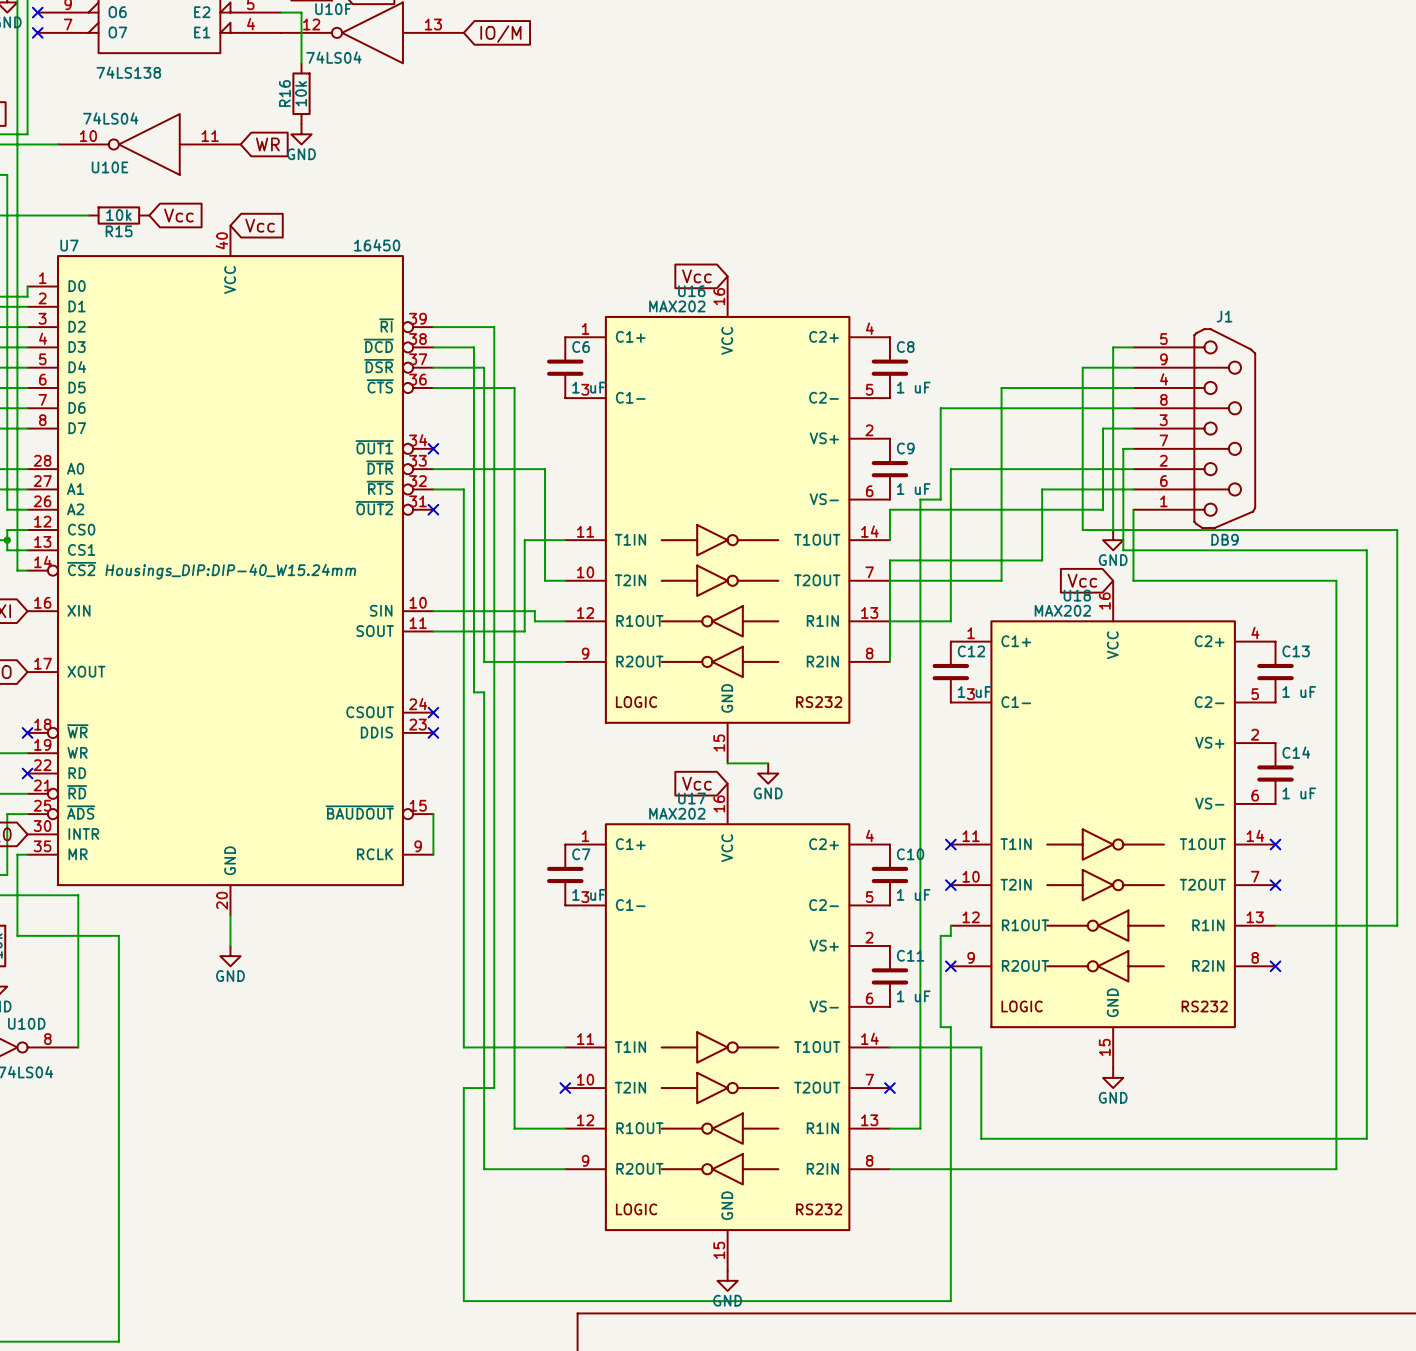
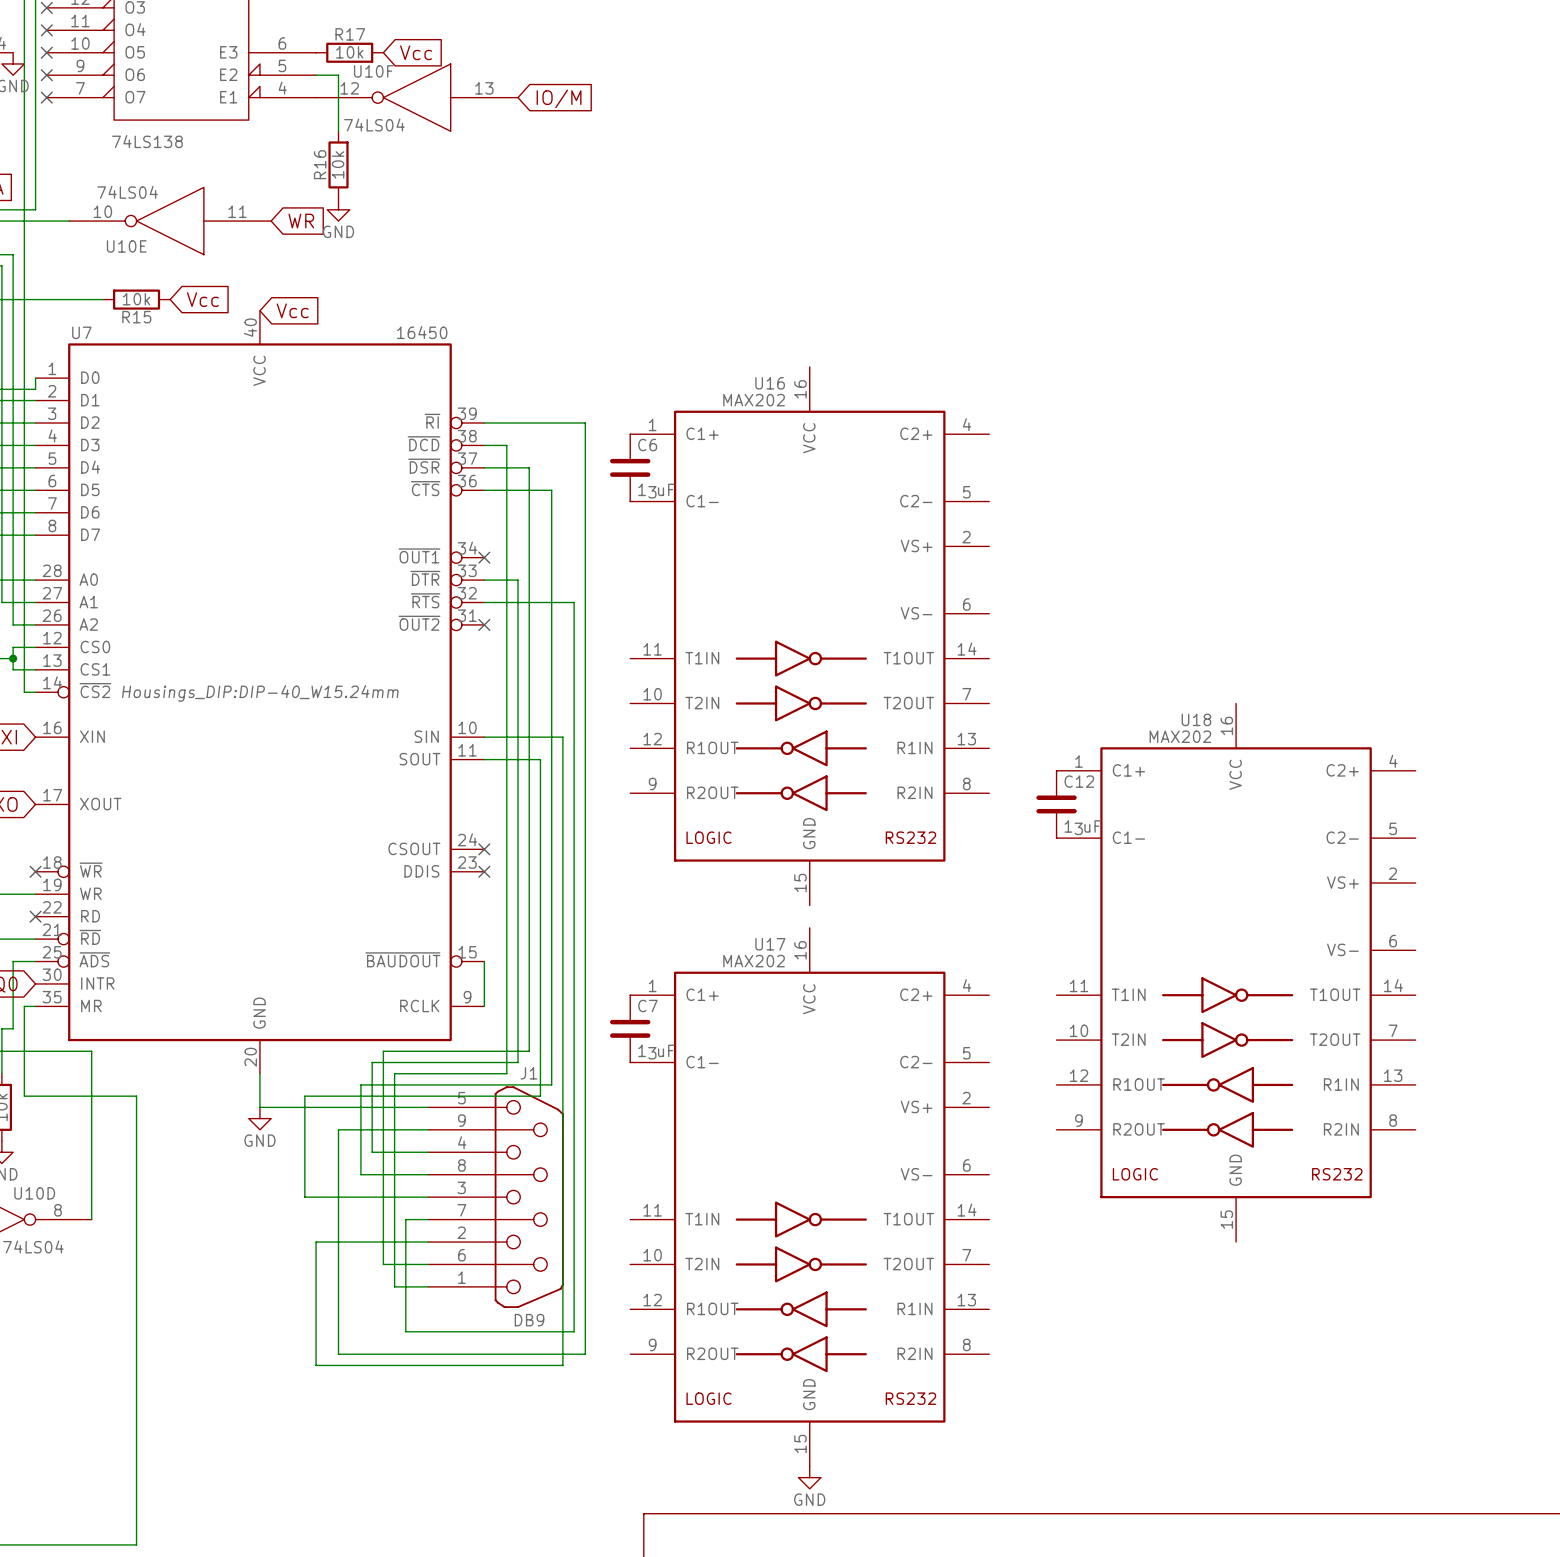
global label: Vcc (696, 276) -> none
wire: (494, 327) (494, 387) (514, 387) (514, 489) -> (551, 422) (585, 422) (585, 658)
wire: (453, 347) (473, 347) (473, 367) (484, 367) (484, 631) (524, 631) -> (506, 445) (506, 1073) (394, 1073) (394, 1286) (428, 1286)
wire: (1133, 347) (1113, 347) (1113, 530) -> none
C8: 1 uF (889, 367) -> none
wire: (1133, 367) (1082, 367) (1082, 530) (1397, 530) (1397, 925) (1275, 925) -> none
wire: (1133, 387) (1001, 387) (1001, 580) (889, 580) -> none
wire: (1133, 408) (940, 408) (940, 499) (920, 499) (920, 1128) (889, 1128) -> none
wire: (1133, 428) (1103, 428) (1103, 509) (889, 509) (889, 540) -> none
J1 position: (1194, 428) -> (496, 1197)
wire: (1133, 448) (1123, 448) (1123, 550) (1366, 550) (1366, 1138) (981, 1138) (981, 1047) (889, 1047) -> none
wire: (463, 469) (545, 469) (545, 580) (565, 580) -> (518, 580) (518, 602) (574, 602)
C9: 1 uF (889, 469) -> none
wire: (1133, 469) (950, 469) (950, 621) (889, 621) -> none
wire: (1133, 489) (1042, 489) (1042, 560) (889, 560) (889, 661) -> none
wire: (1133, 509) (1133, 580) (1336, 580) (1336, 1169) (889, 1169) -> none
wire: (524, 540) (565, 540) -> none
power symbol: GND (1113, 540) -> none
global label: Vcc (1082, 580) -> none
wire: (504, 611) (534, 611) (534, 621) (565, 621) -> (562, 737) (562, 1365) (316, 1365) (316, 1242) (428, 1242)
wire: (484, 661) (565, 661) -> none
C13: 1 uF (1275, 672) -> none
wire: (473, 692) (484, 692) -> (540, 793) (540, 826)
wire: none -> (529, 826) (529, 1051) (383, 1051) (383, 1264) (428, 1264)
wire: (727, 763) (768, 763) -> none
power symbol: GND (768, 773) -> none
C14: 1 uF (1275, 773) -> none
global label: Vcc (696, 783) -> none
no-connect mark: (950, 844) -> none
no-connect mark: (1275, 844) -> none
C10: 1 uF (889, 874) -> none
no-connect mark: (950, 885) -> none
no-connect mark: (1275, 885) -> none
wire: (463, 905) (463, 1047) (565, 1047) -> (518, 1062) (372, 1062) (372, 1152) (428, 1152)
wire: (494, 925) (494, 1088) (463, 1088) (463, 1301) (950, 1301) (950, 1027) (940, 1027) (940, 935) (950, 935) (950, 925) -> (551, 1084) (360, 1084) (360, 1174) (428, 1174)
wire: (484, 935) (484, 1169) -> (428, 1129) (338, 1129) (338, 1354) (540, 1354)
wire: none -> (540, 1096) (304, 1096) (304, 1197) (428, 1197)
wire: none -> (259, 1107) (428, 1107)
no-connect mark: (950, 966) -> none
no-connect mark: (1275, 966) -> none
C11: 1 uF (889, 976) -> none
power symbol: GND (1113, 1077) -> none
no-connect mark: (565, 1088) -> none
no-connect mark: (889, 1088) -> none
wire: (514, 1128) (565, 1128) -> (574, 1309) (574, 1331) (405, 1331) (405, 1219) (428, 1219)
wire: (524, 1169) (565, 1169) -> (585, 1354) (585, 759)

